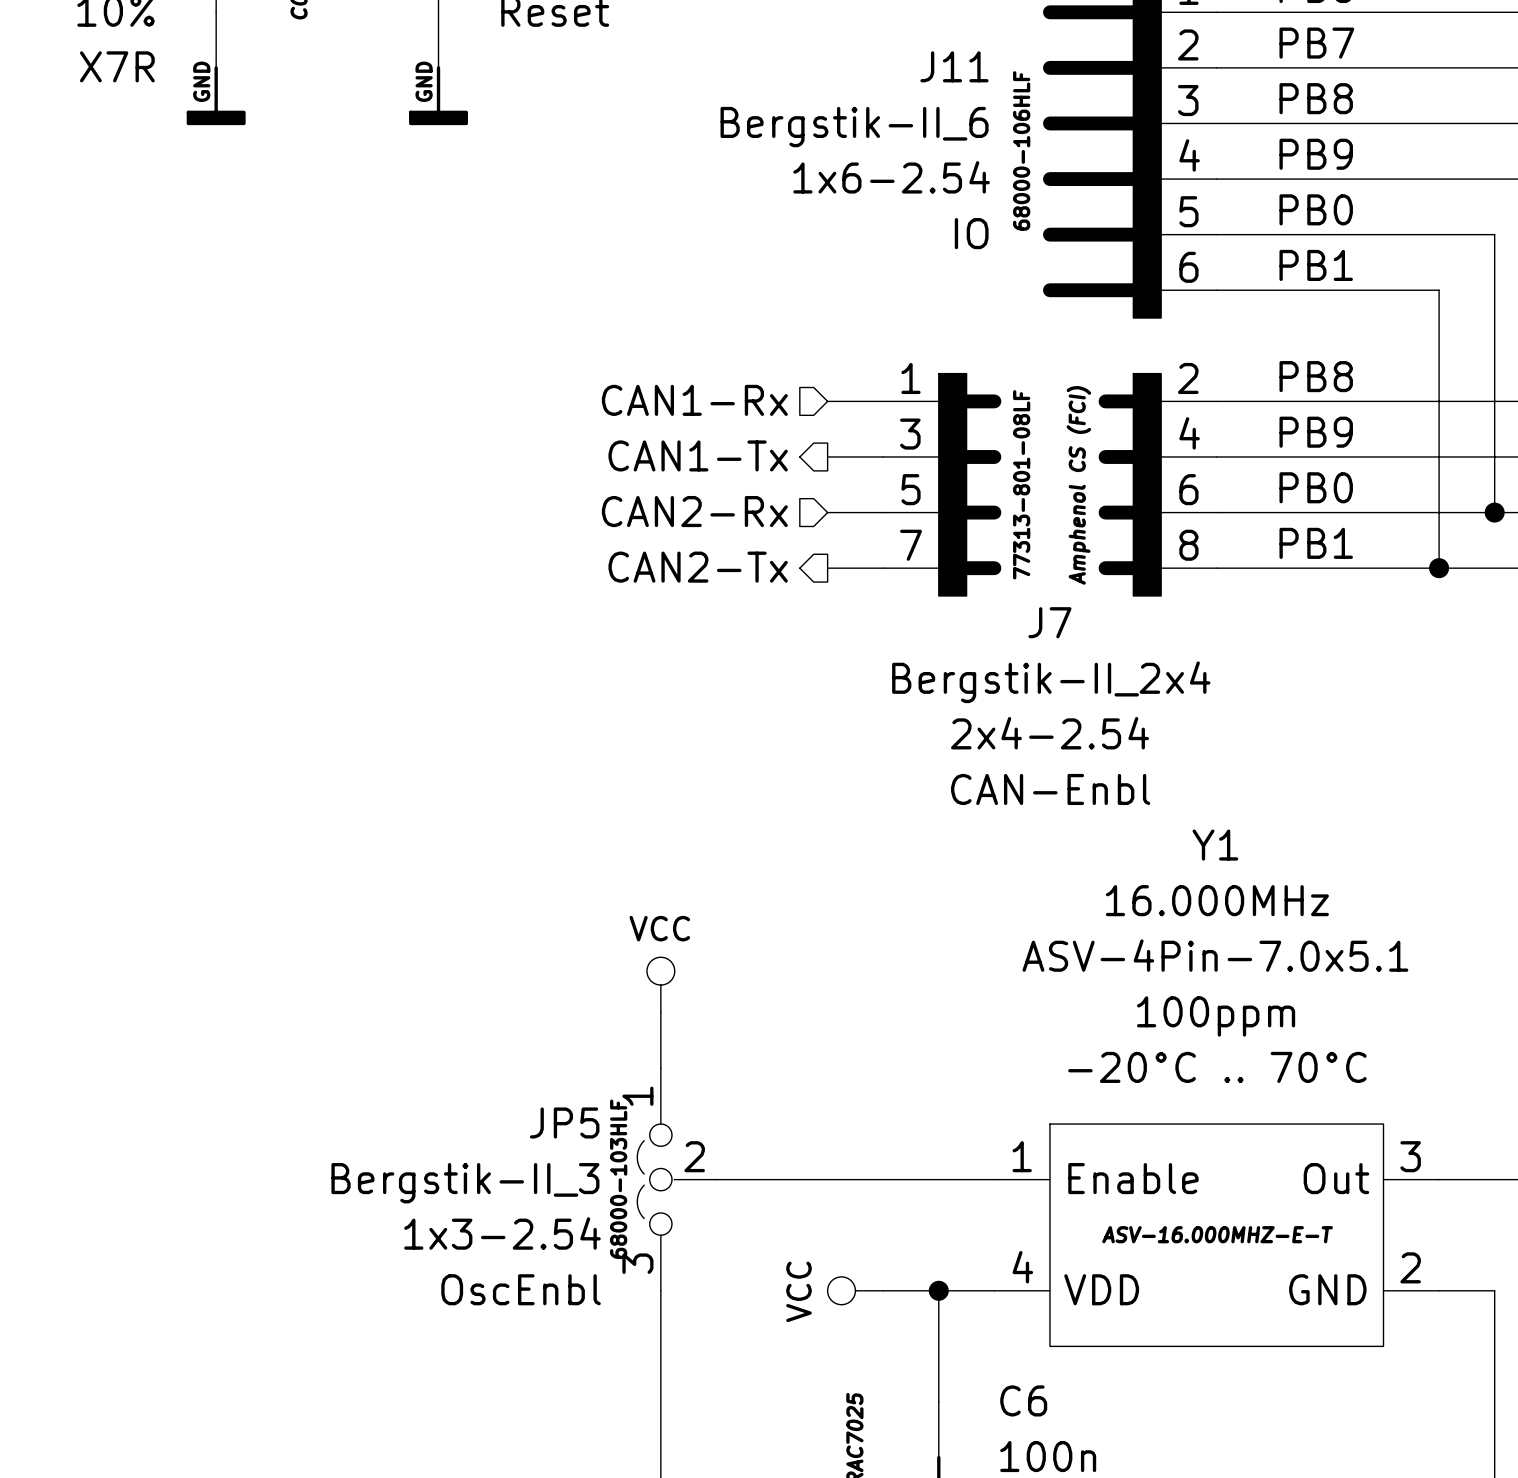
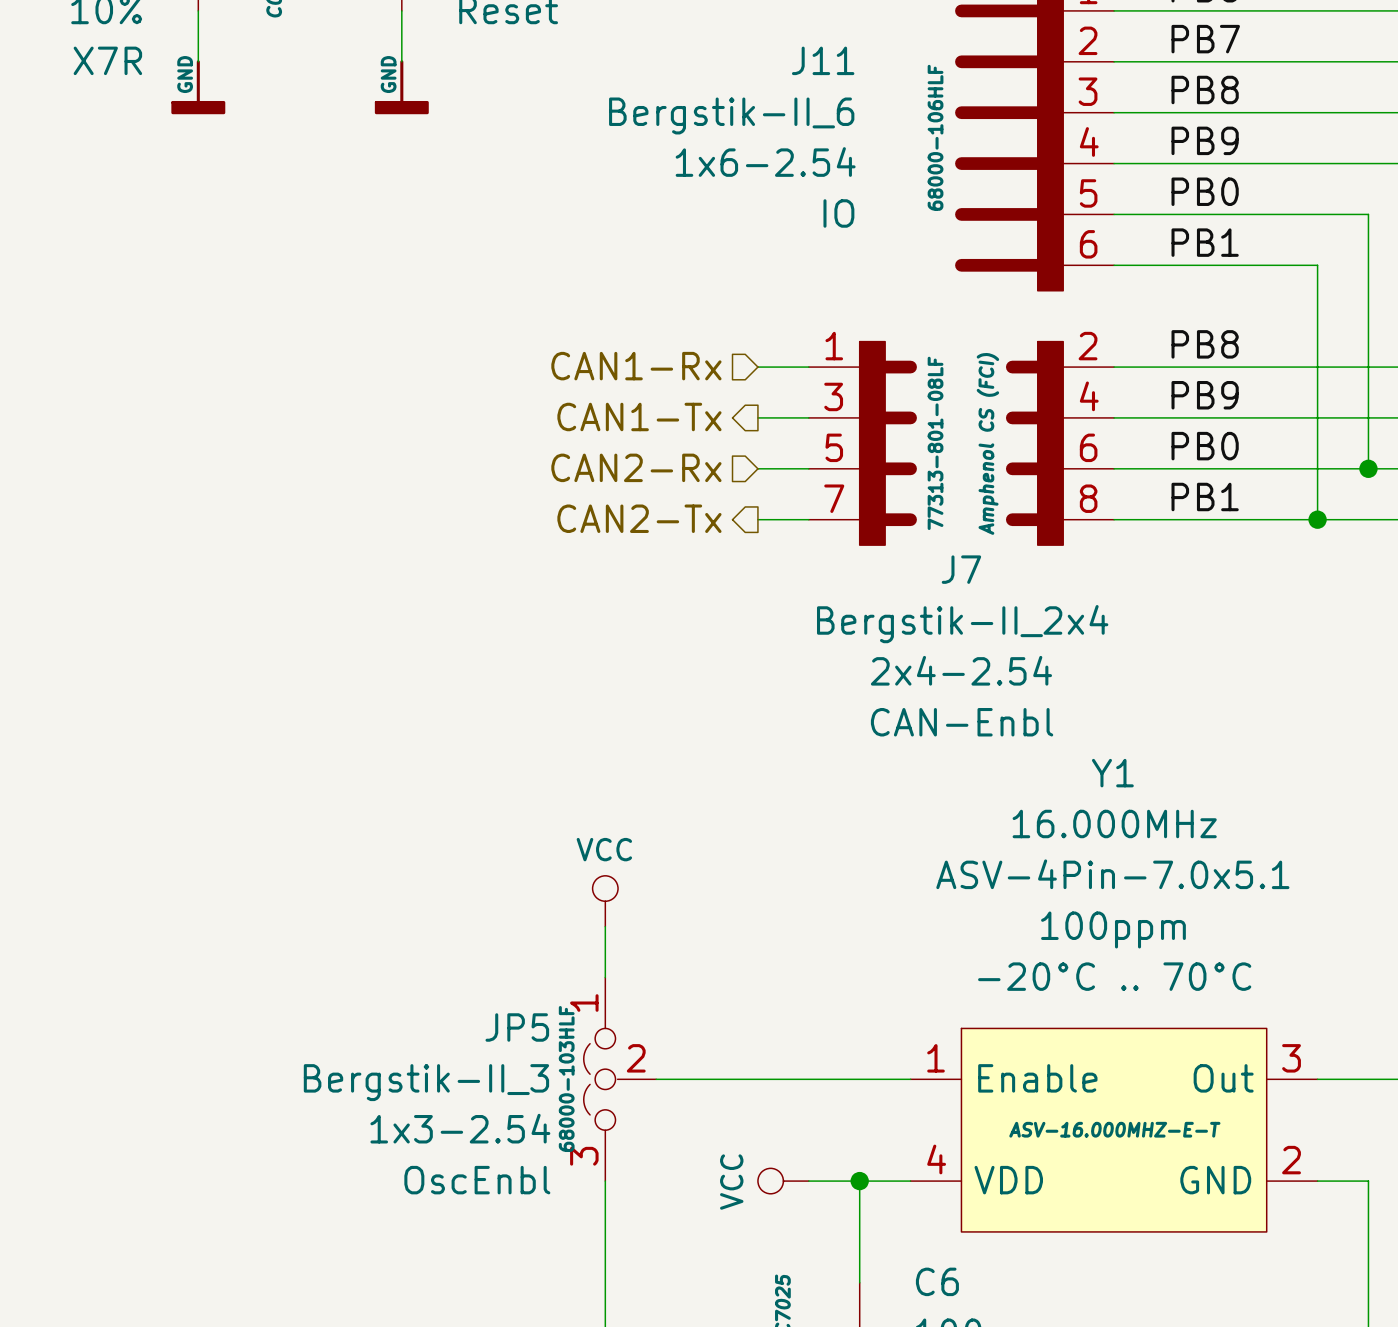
J11 name position: J11 (954, 66) -> J11 (823, 60)
J11 value position: Bergstik-II_6 (854, 127) -> Bergstik-II_6 (731, 115)
J11 text position: 1x6-2.54 (891, 177) -> 1x6-2.54 (765, 162)
J11 text position: IO (971, 233) -> IO (838, 213)

